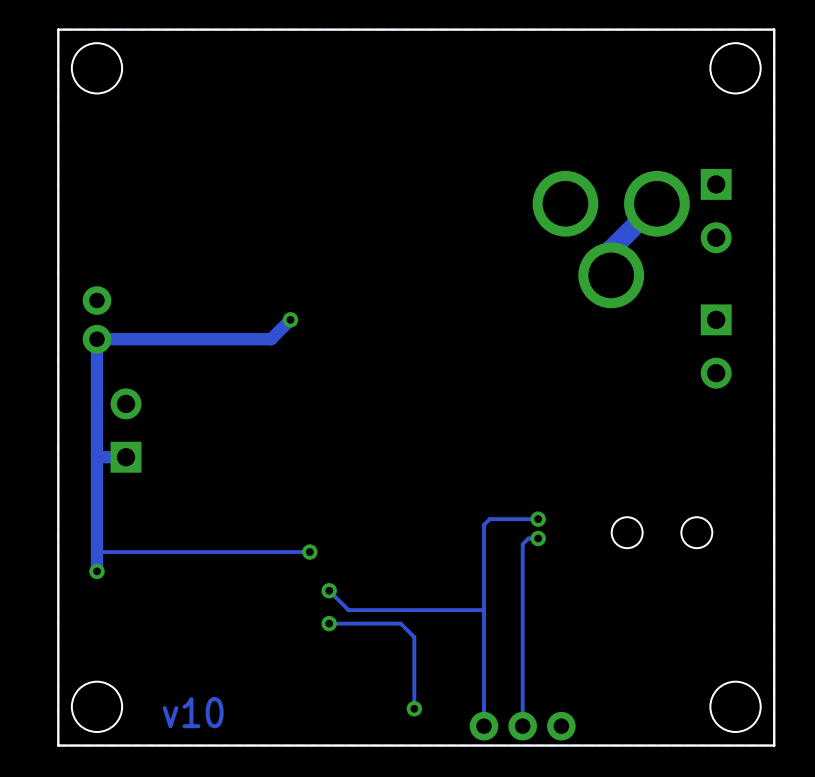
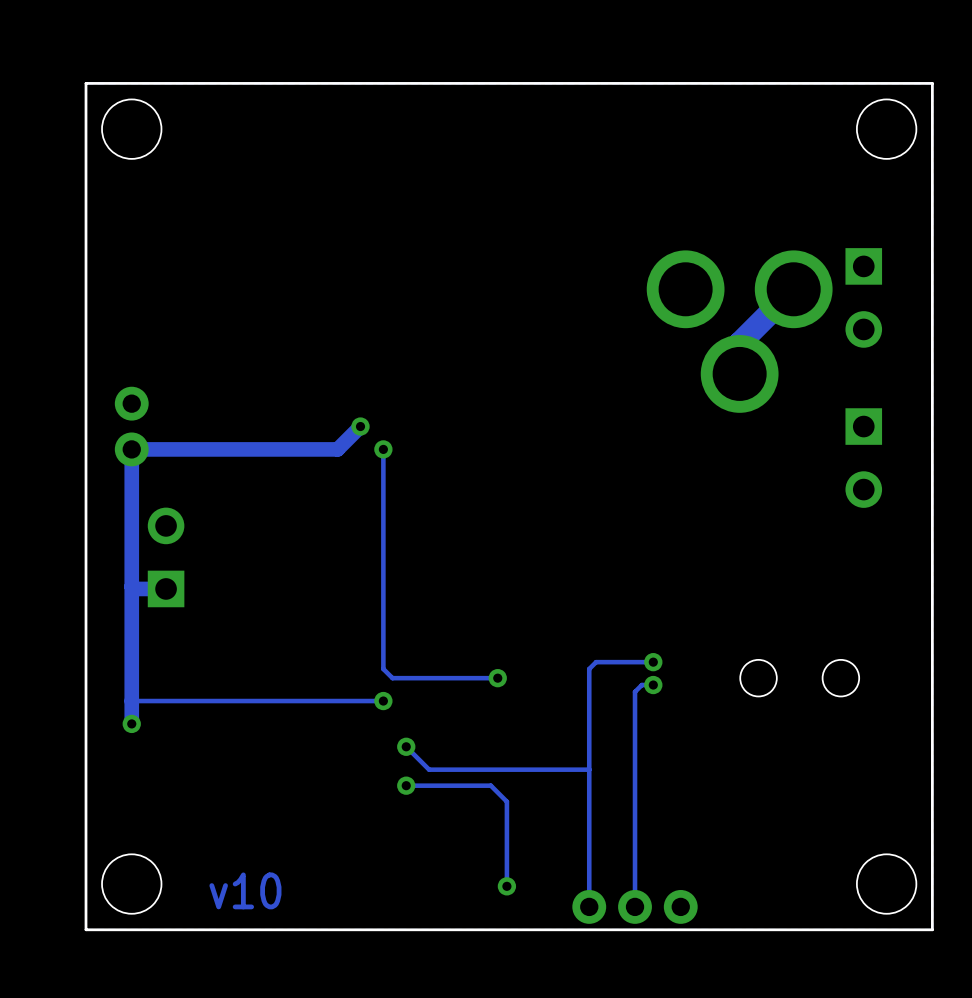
track: none -> (383, 449) (383, 669) (392, 678) (497, 678)
via: none -> (383, 449)
via: none -> (497, 678)

